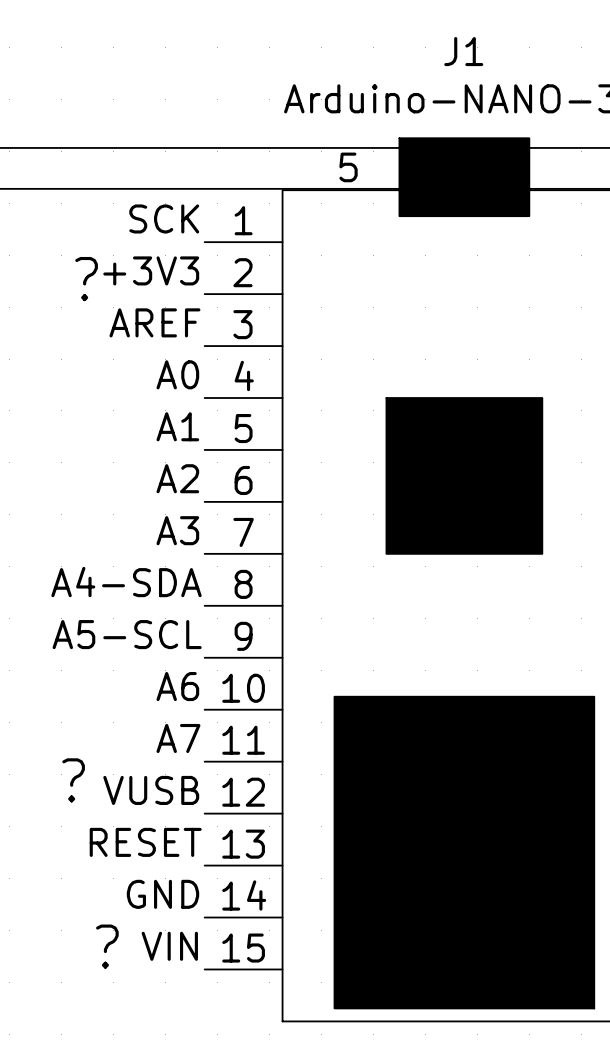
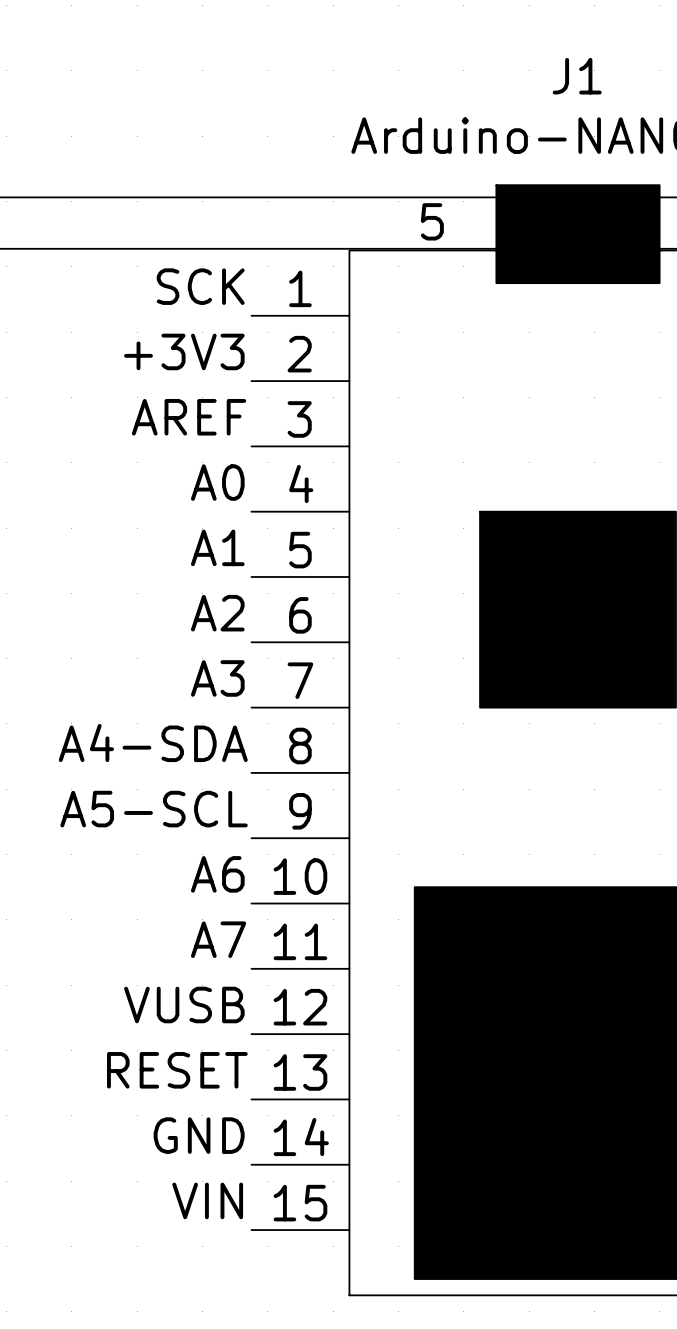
text: ? (86, 279) -> none
text: ? (73, 780) -> none
text: ? (107, 946) -> none

